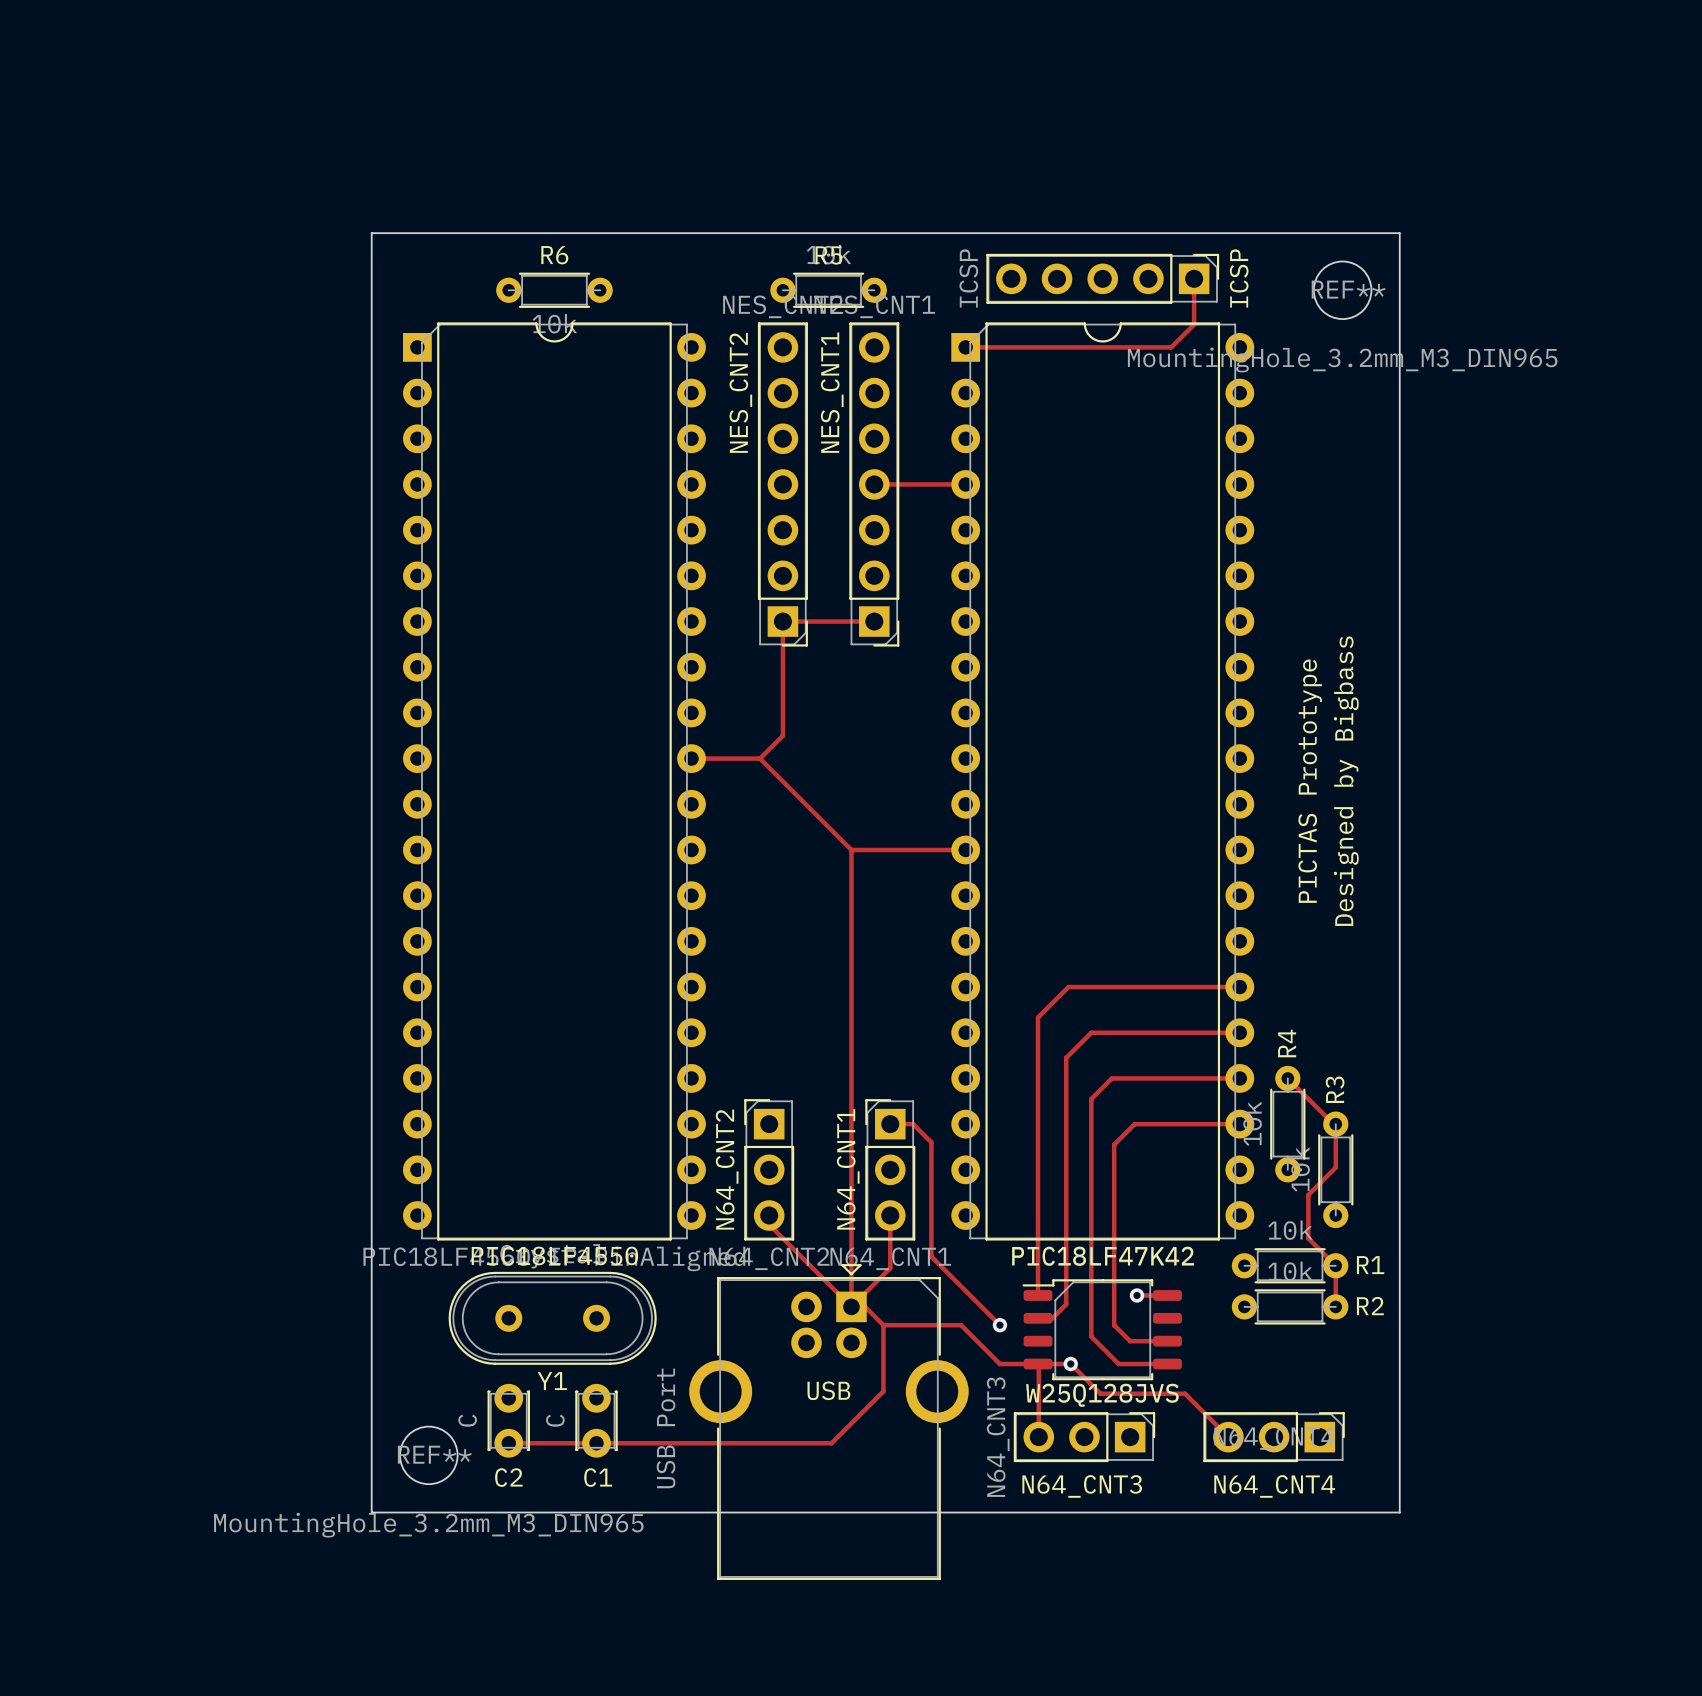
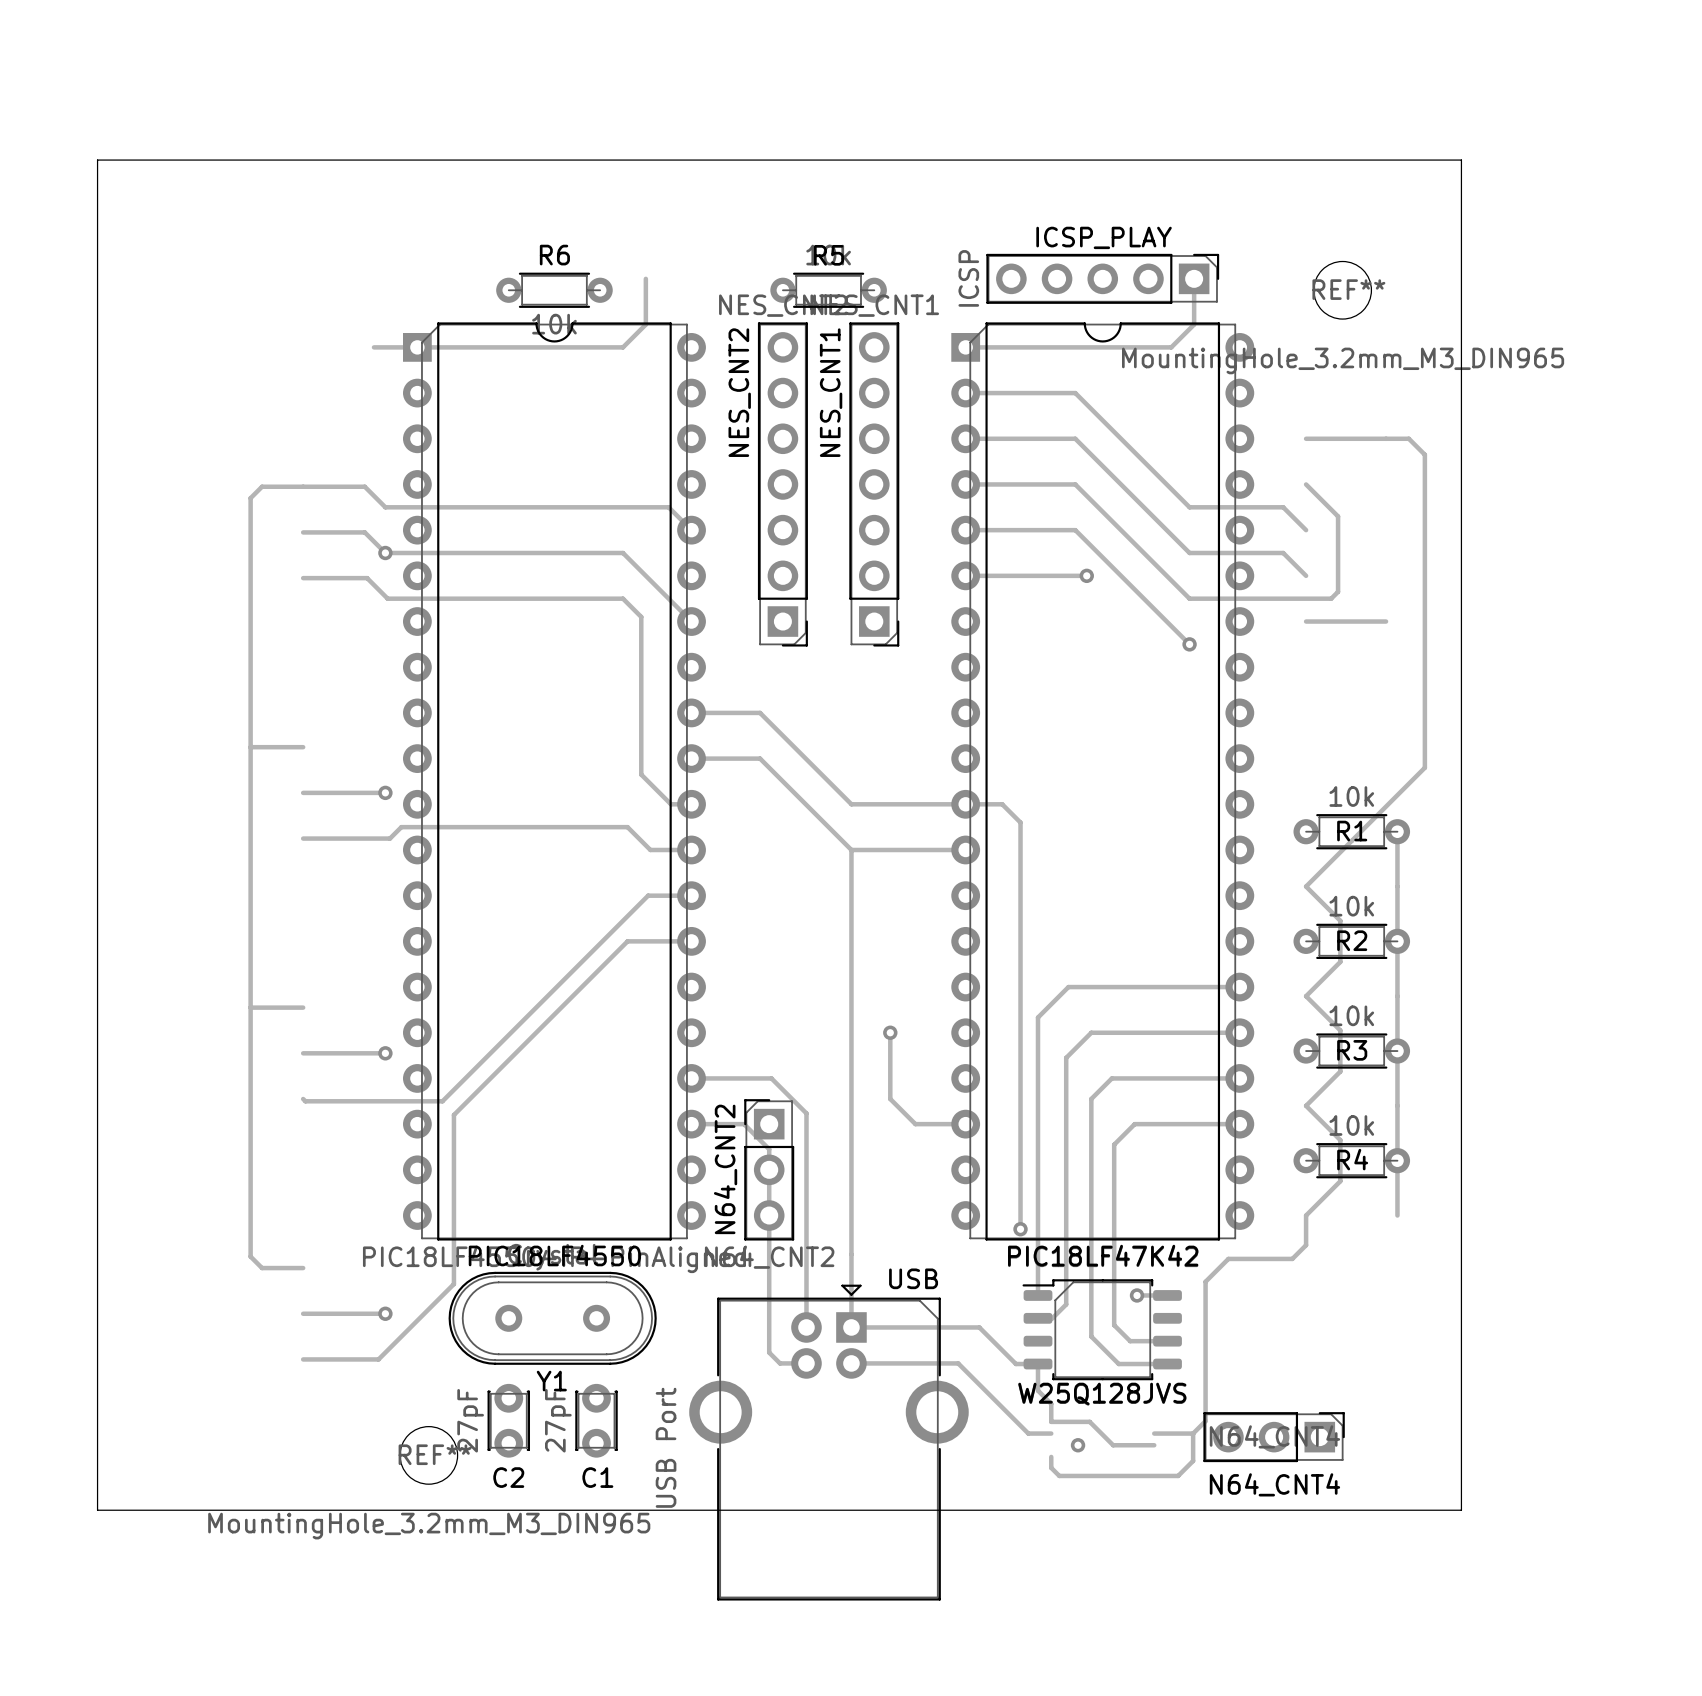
board edge: (371, 233) (371, 1512) (1399, 1512) (1399, 233) (371, 233) -> (97, 160) (97, 1510) (1461, 1510) (1461, 160) (97, 160)
track: none -> (645, 278) (645, 324) (623, 347) (373, 347)
ICSP name: ICSP (1239, 278) -> ICSP_PLAY (1104, 237)
track: none -> (965, 393) (1075, 393) (1189, 507) (1283, 507) (1306, 530)
track: none -> (965, 438) (1075, 438) (1189, 553) (1283, 553) (1306, 575)
track: none -> (1306, 438) (1408, 438) (1424, 454) (1424, 767) (1306, 886) (1340, 920) (1340, 961) (1306, 996) (1340, 1030) (1340, 1071) (1306, 1105) (1340, 1140) (1340, 1181) (1306, 1215) (1306, 1245) (1292, 1258) (1228, 1258) (1205, 1281) (1205, 1421) (1193, 1433)
track: (874, 484) (965, 484) -> (1306, 484) (1338, 516) (1338, 591) (1331, 598) (1189, 598) (1075, 484) (965, 484)
track: none -> (691, 530) (668, 507) (385, 507) (364, 486) (262, 486) (250, 498) (250, 1256) (262, 1268) (303, 1268)
track: none -> (965, 530) (1075, 530) (1189, 644)
track: none -> (303, 532) (364, 532) (385, 553) (623, 553) (691, 621)
via: none -> (385, 553)
track: none -> (965, 575) (1086, 575)
via: none -> (1086, 575)
track: none -> (303, 578) (367, 578) (387, 598) (623, 598) (641, 616) (641, 774) (670, 804) (691, 804)
track: (874, 621) (782, 621) (782, 735) (760, 758) -> none
track: none -> (1306, 621) (1386, 621)
via: none -> (1189, 644)
track: none -> (691, 712) (760, 712) (851, 804) (1002, 804) (1020, 822) (1020, 1229)
track: none -> (250, 747) (303, 747)
text: PICTAS Prototype (1310, 781) -> none
text: Designed by Bigbass (1346, 781) -> none
track: none -> (303, 792) (385, 792)
via: none -> (385, 792)
track: none -> (1397, 831) (1397, 1215)
track: none -> (303, 838) (389, 838) (401, 827) (627, 827) (650, 849) (691, 849)
track: none -> (691, 895) (648, 895) (442, 1101) (305, 1101) (303, 1099)
track: none -> (691, 941) (627, 941) (453, 1115) (453, 1284) (378, 1359) (303, 1359)
track: none -> (250, 1007) (303, 1007)
track: none -> (890, 1032) (890, 1099) (915, 1124) (965, 1124)
via: none -> (890, 1032)
R4 name position: R4 (1287, 1043) -> R4 (1352, 1159)
track: none -> (303, 1053) (385, 1053)
via: none -> (385, 1053)
track: none -> (691, 1078) (771, 1078) (806, 1113) (806, 1327)
track: (1287, 1078) (1333, 1124) (1335, 1124) (1335, 1167) (1308, 1194) (1308, 1238) (1335, 1265) (1335, 1306) -> none
R3 name position: R3 (1335, 1089) -> R3 (1352, 1050)
track: none -> (691, 1124) (744, 1124) (769, 1149) (769, 1215)
track: (890, 1124) (913, 1124) (931, 1142) (931, 1256) (999, 1325) -> none
R4 rotation: 0° (1287, 1124) -> 90° clockwise (1351, 1160)
R4 position: (1287, 1124) -> (1351, 1160)
N64_CNT1: N64_CNT1 (890, 1169) -> none
R3 rotation: 0° (1335, 1169) -> 90° clockwise (1351, 1051)
R3 position: (1335, 1169) -> (1351, 1051)
track: (890, 1215) (890, 1268) (851, 1306) -> none
track: (769, 1224) (851, 1306) -> (769, 1224) (769, 1352) (780, 1363) (806, 1363)
via: none -> (1020, 1229)
R1 position: (1290, 1265) -> (1351, 831)
R1 name position: R1 (1370, 1265) -> R1 (1352, 831)
track: (851, 1306) (865, 1306) (883, 1325) -> none
R2 position: (1290, 1306) -> (1351, 941)
R2 name position: R2 (1370, 1306) -> R2 (1352, 940)
track: none -> (303, 1313) (385, 1313)
via: none -> (385, 1313)
track: (883, 1325) (961, 1325) (999, 1364) (1015, 1364) -> (851, 1306) (851, 1327) (979, 1327) (1015, 1364)
track: (883, 1325) (883, 1391) (831, 1443) (508, 1443) -> none
via: (999, 1325) -> none
track: none -> (851, 1363) (958, 1363) (1028, 1433) (1051, 1433)
track: none -> (1038, 1364) (1038, 1390) (1051, 1403) (1051, 1421) (1089, 1421) (1113, 1445) (1154, 1445)
via: (1070, 1364) -> none
USB name position: USB (828, 1390) -> USB (913, 1278)
C2 value: C (467, 1420) -> 27pF (470, 1420)
C1 value: C (555, 1420) -> 27pF (558, 1420)
USB position: (828, 1422) -> (828, 1442)
track: none -> (1154, 1433) (1193, 1433)
track: none -> (1193, 1433) (1193, 1460) (1178, 1475) (1059, 1475) (1051, 1467) (1051, 1456)
track: (1038, 1437) (1038, 1364) (1070, 1364) (1100, 1393) (1185, 1393) (1228, 1437) -> none
N64_CNT3: N64_CNT3 (1084, 1437) -> none
via: none -> (1078, 1445)

